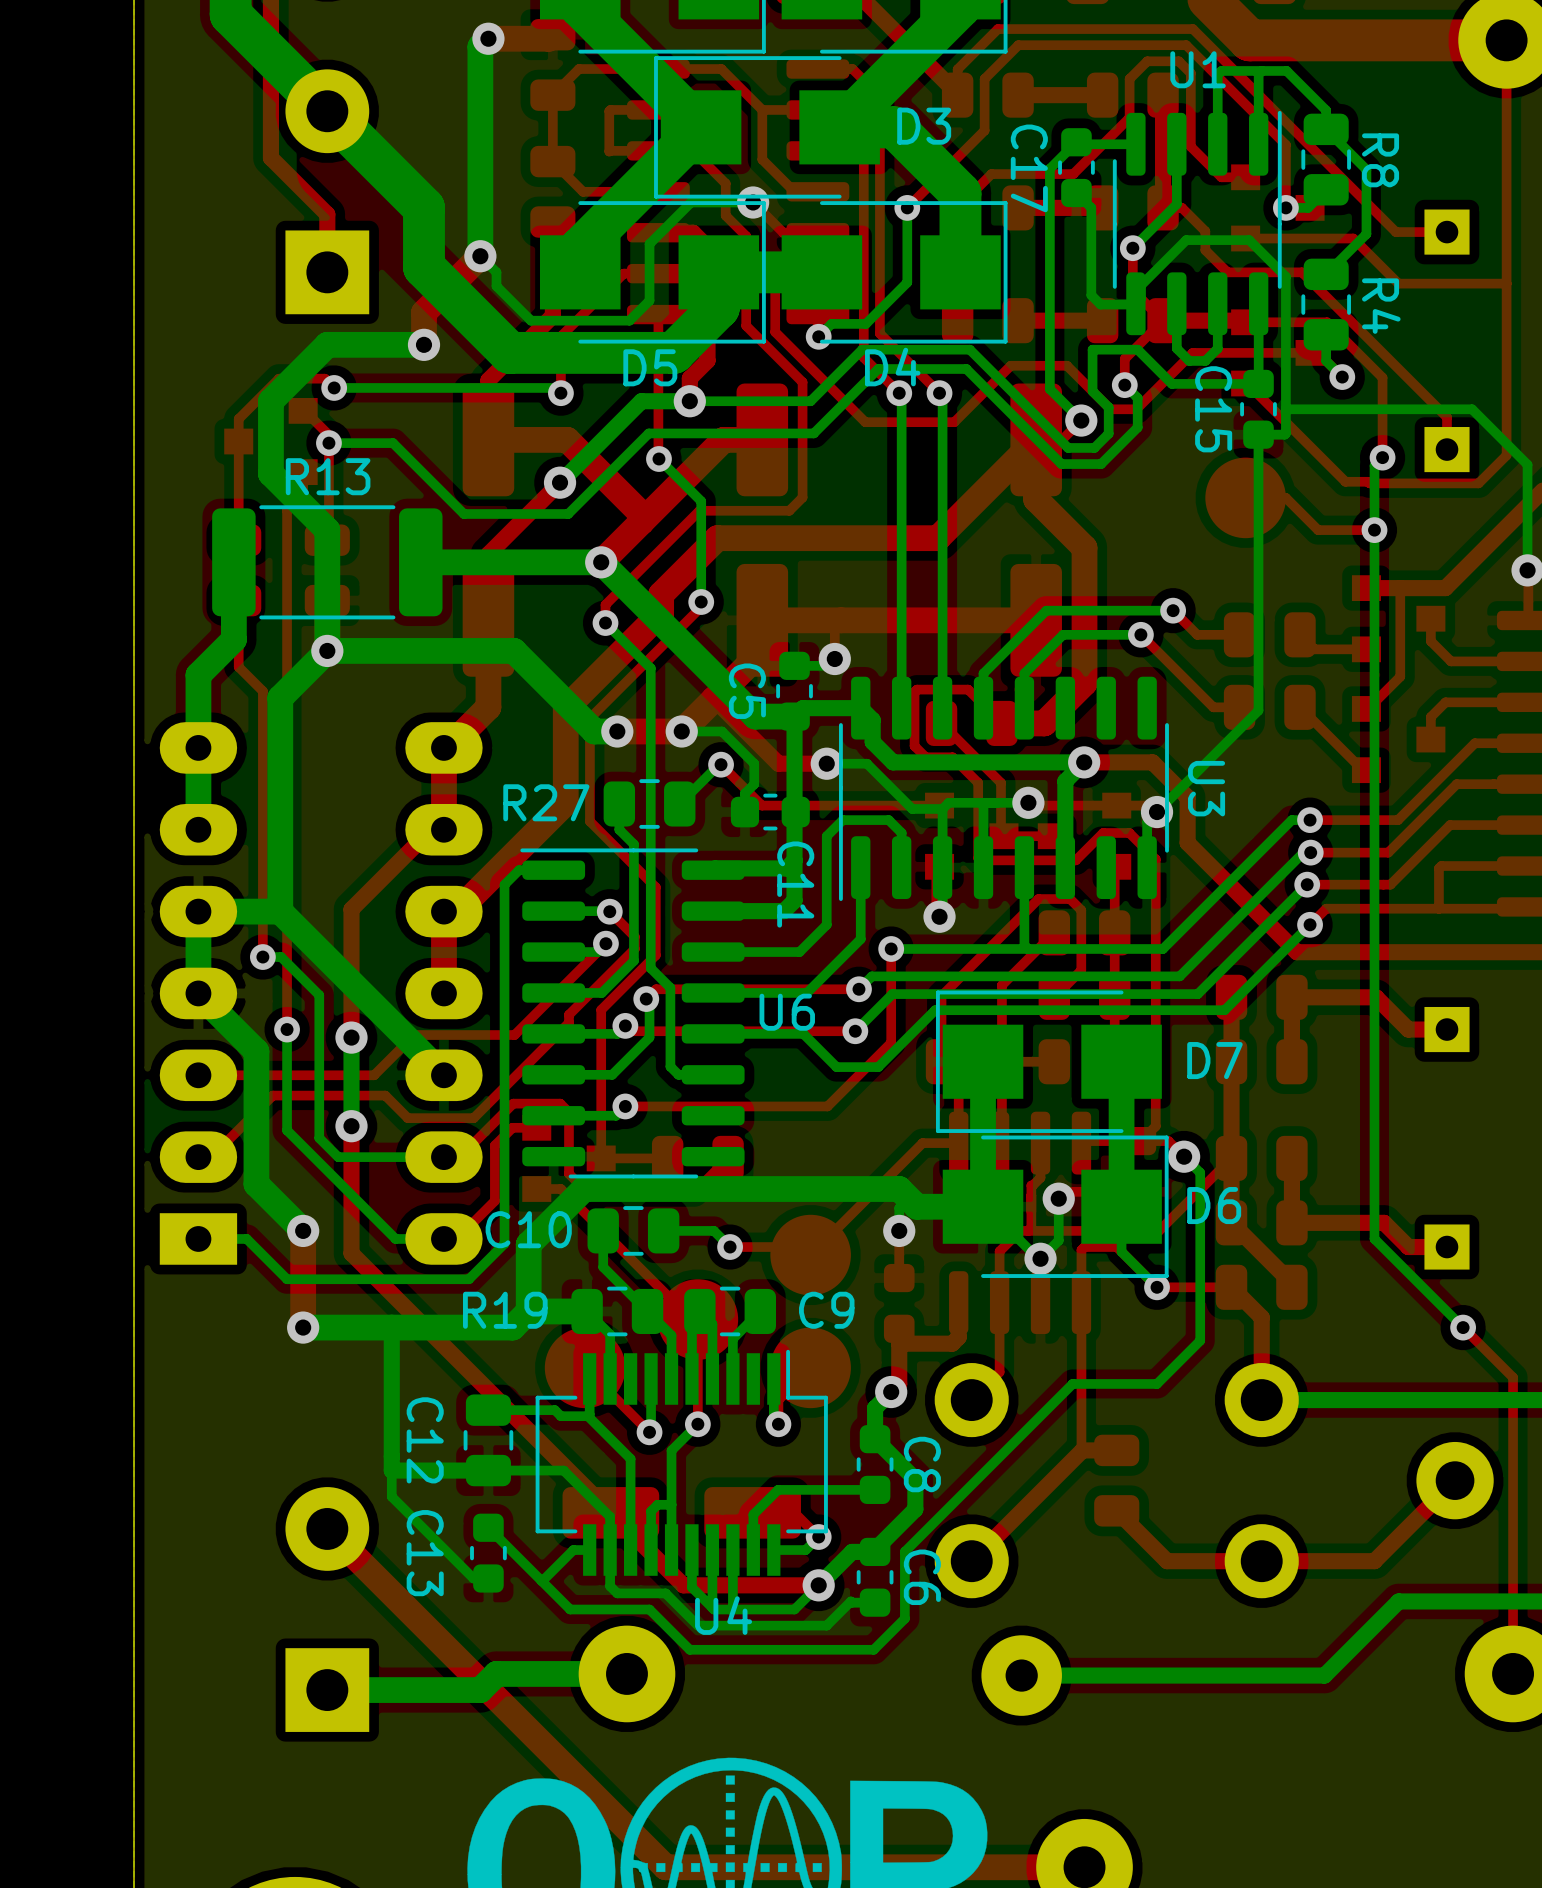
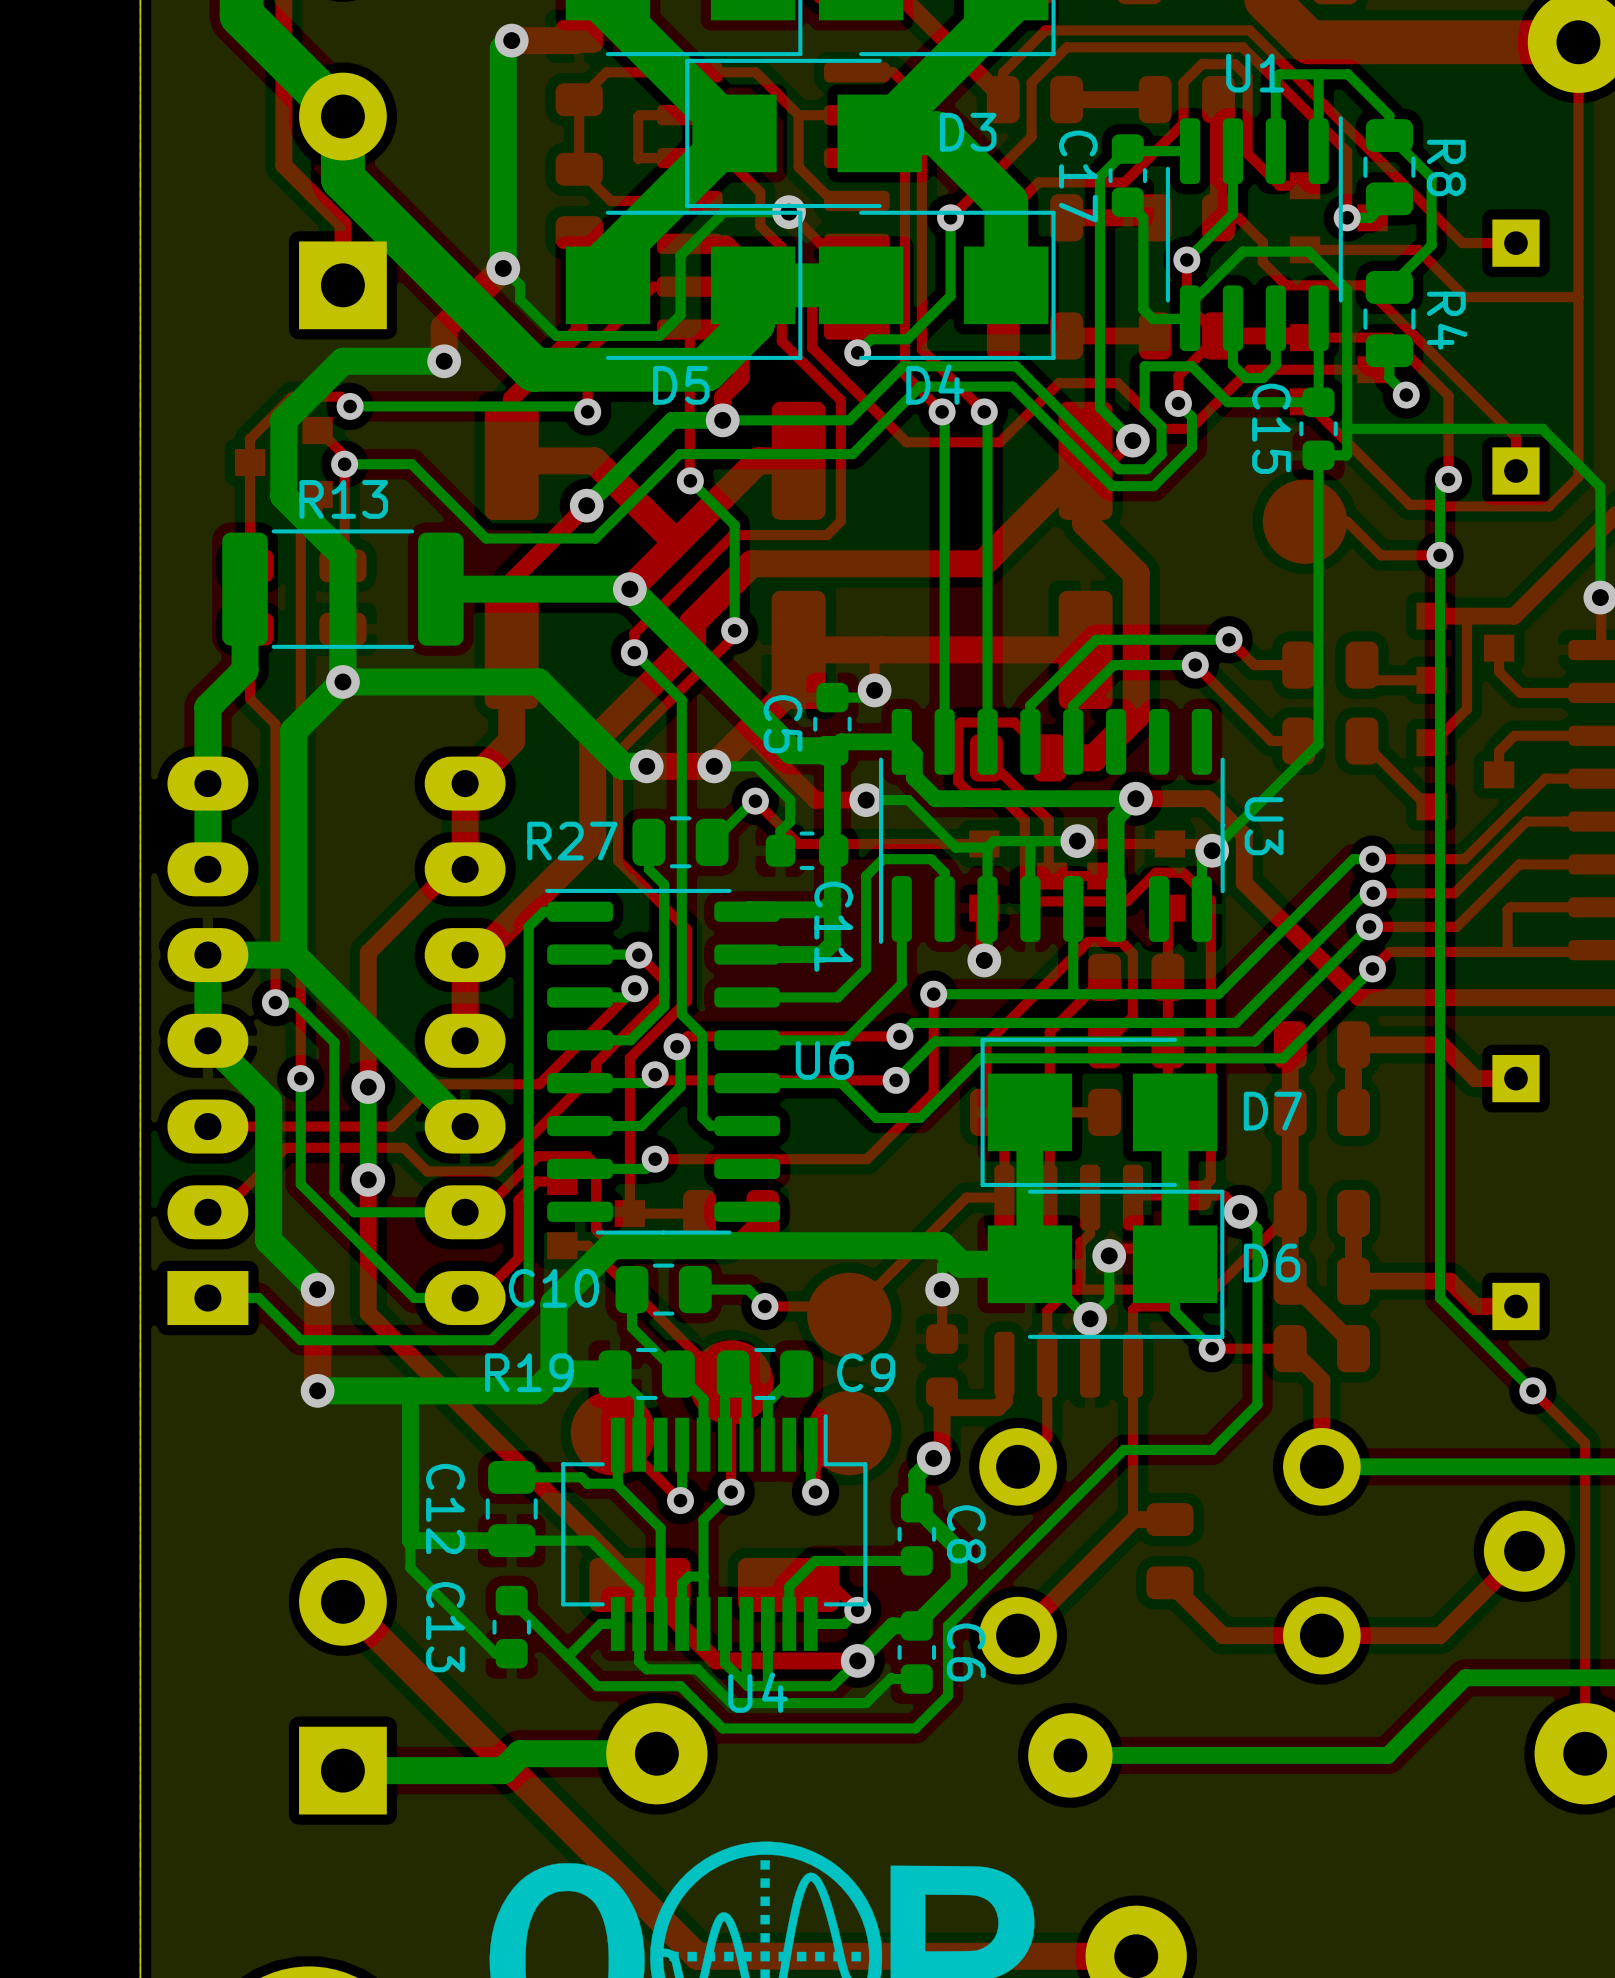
bottom track: (327, 111) (423, 207) (423, 267) -> (342, 116) (342, 178) (444, 279)

